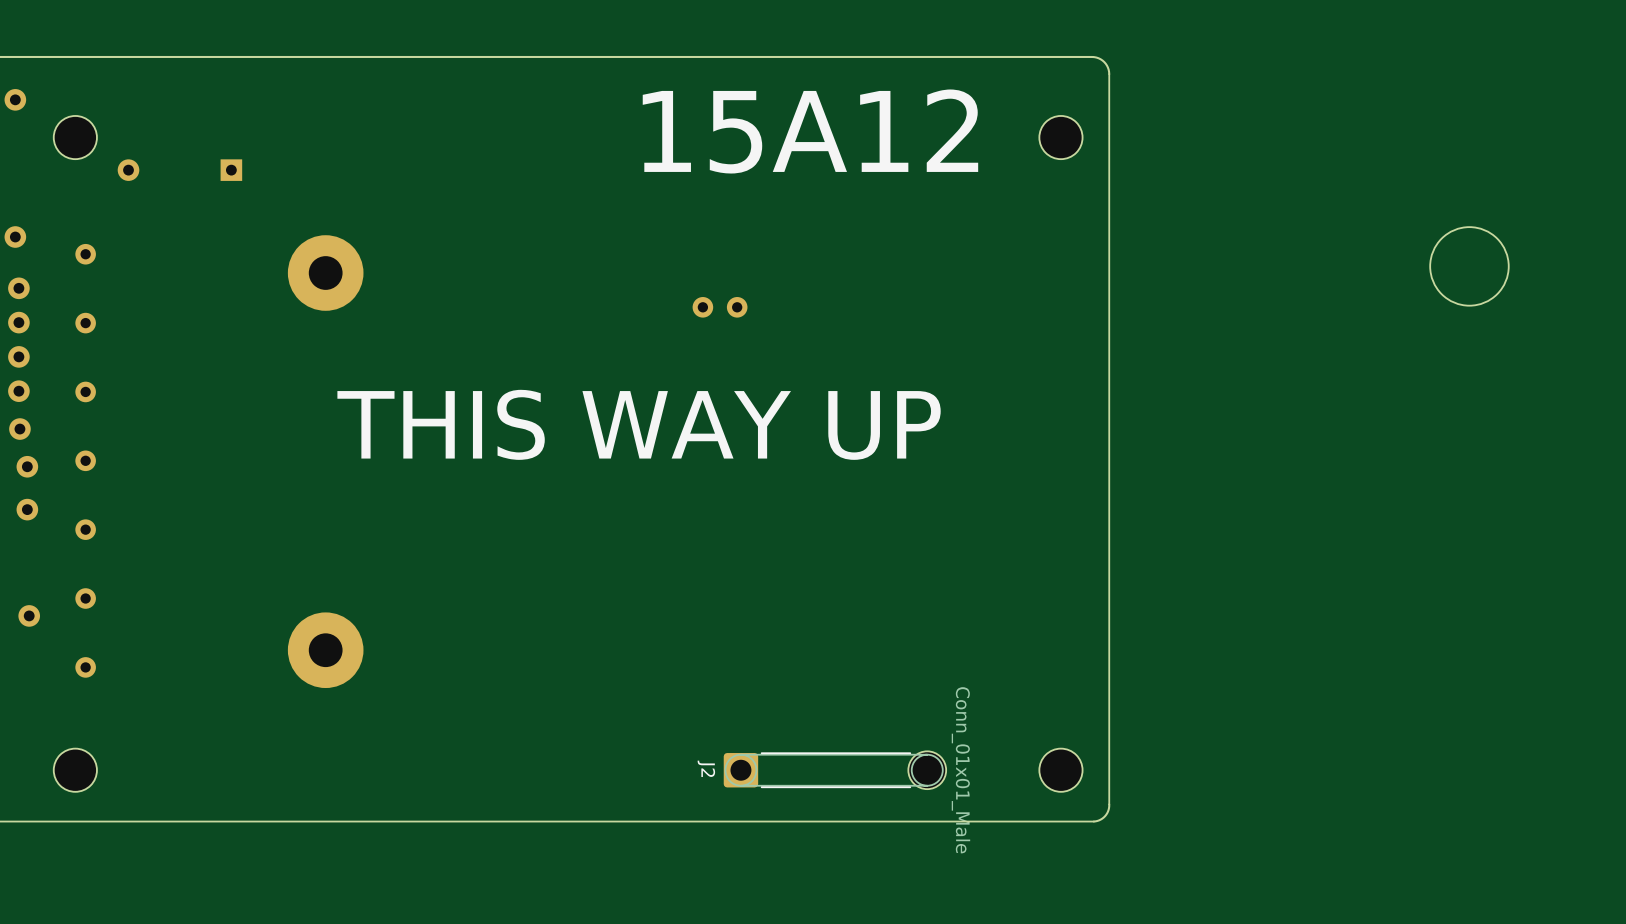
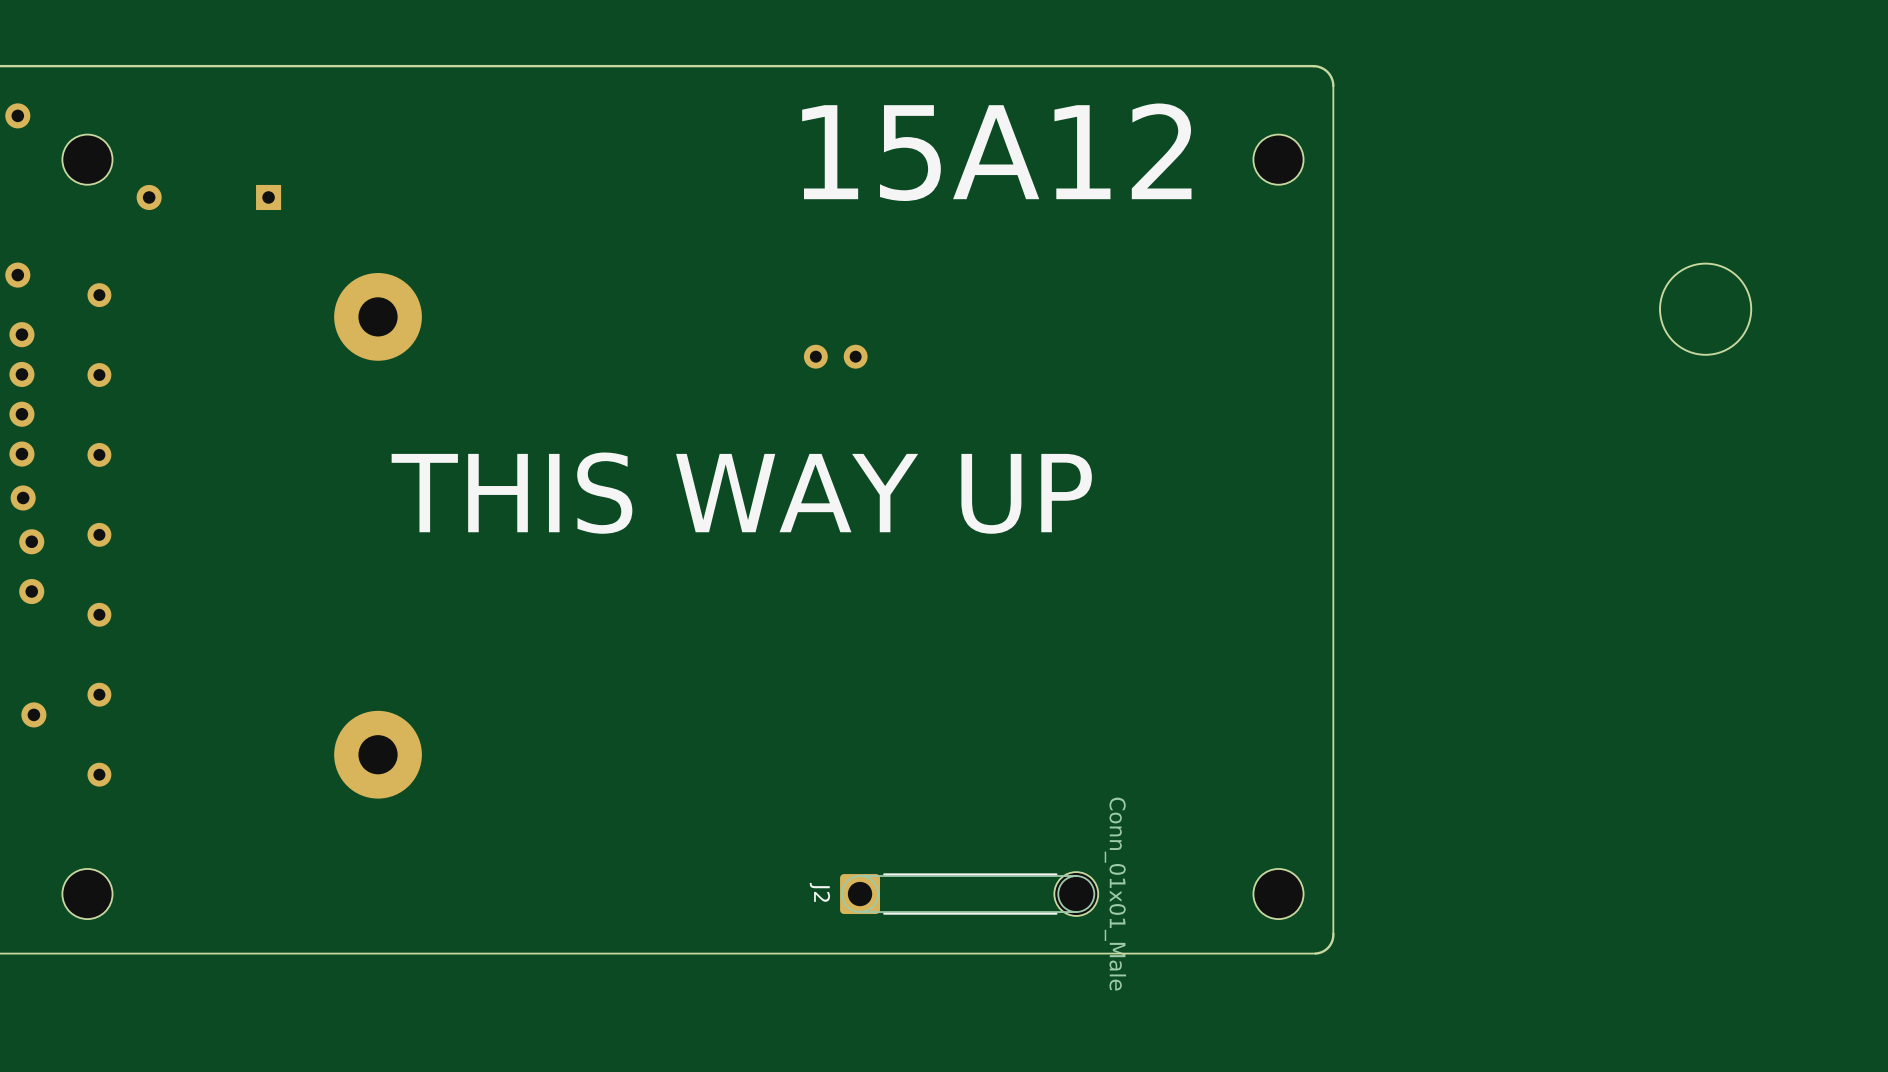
board edge: (1092, 56) (1104, 62) (1109, 74) (1109, 806) (1105, 816) (1093, 821) -> (1267, 66) (1318, 66) (1329, 73) (1333, 86) (1333, 935) (1328, 947) (1319, 952) (1269, 953)
text position: 15A12 (810, 131) -> 15A12 (996, 152)
part position: (1060, 137) -> (1278, 159)
part position: (1060, 770) -> (1278, 894)

